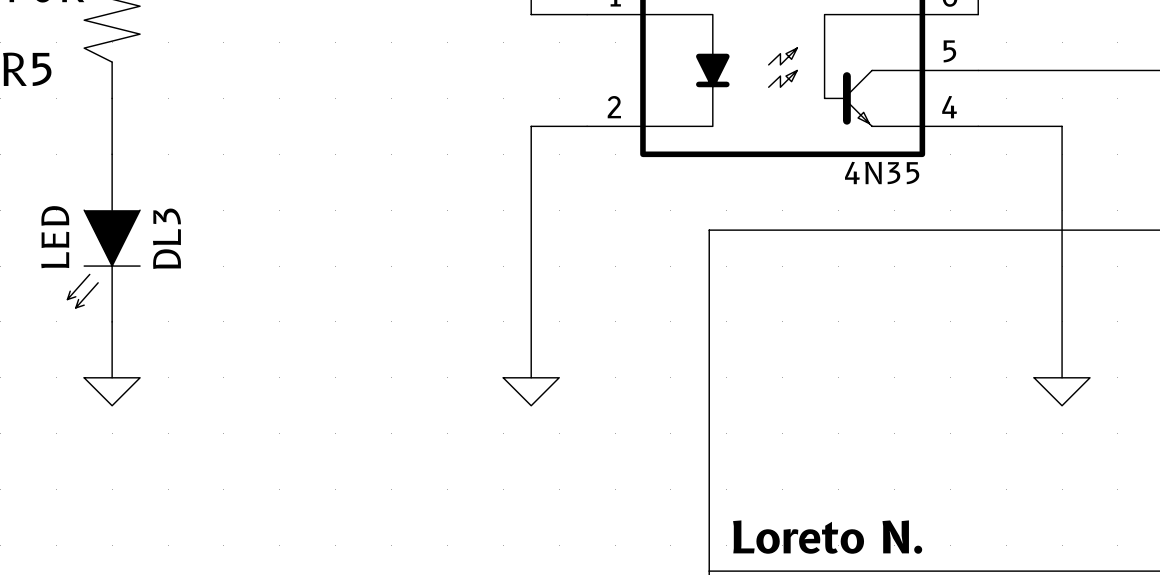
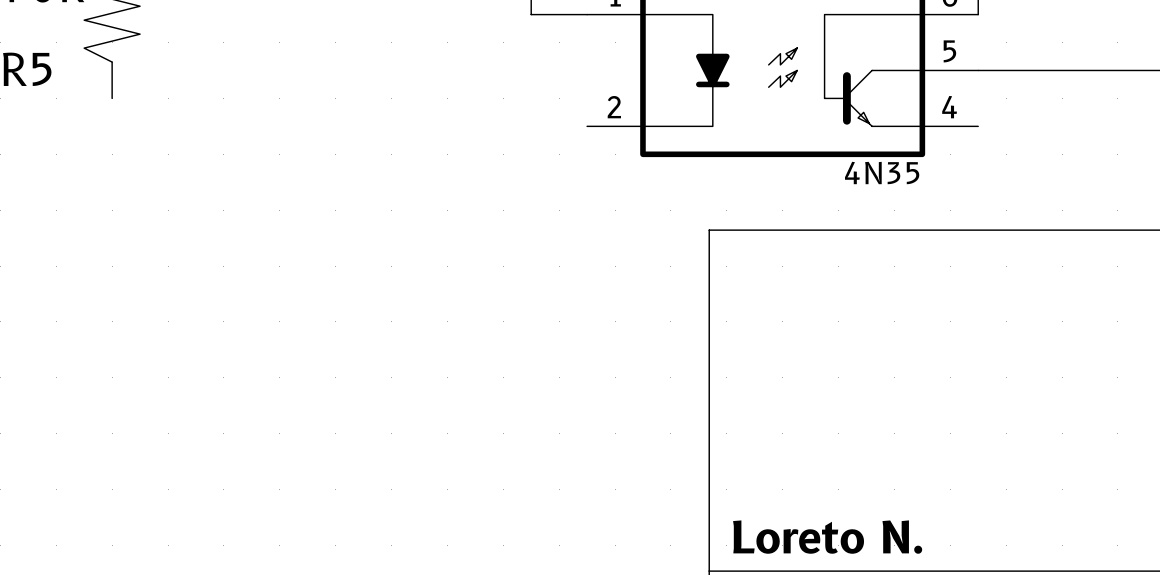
wire: (112, 98) (112, 154) -> none
wire: (587, 126) (531, 126) (531, 377) -> none
wire: (978, 126) (1062, 126) (1062, 377) -> none
DL3: LED (103, 238) -> none
wire: (112, 321) (112, 377) -> none
power symbol: (112, 391) -> none
power symbol: (531, 391) -> none
power symbol: (1062, 391) -> none

